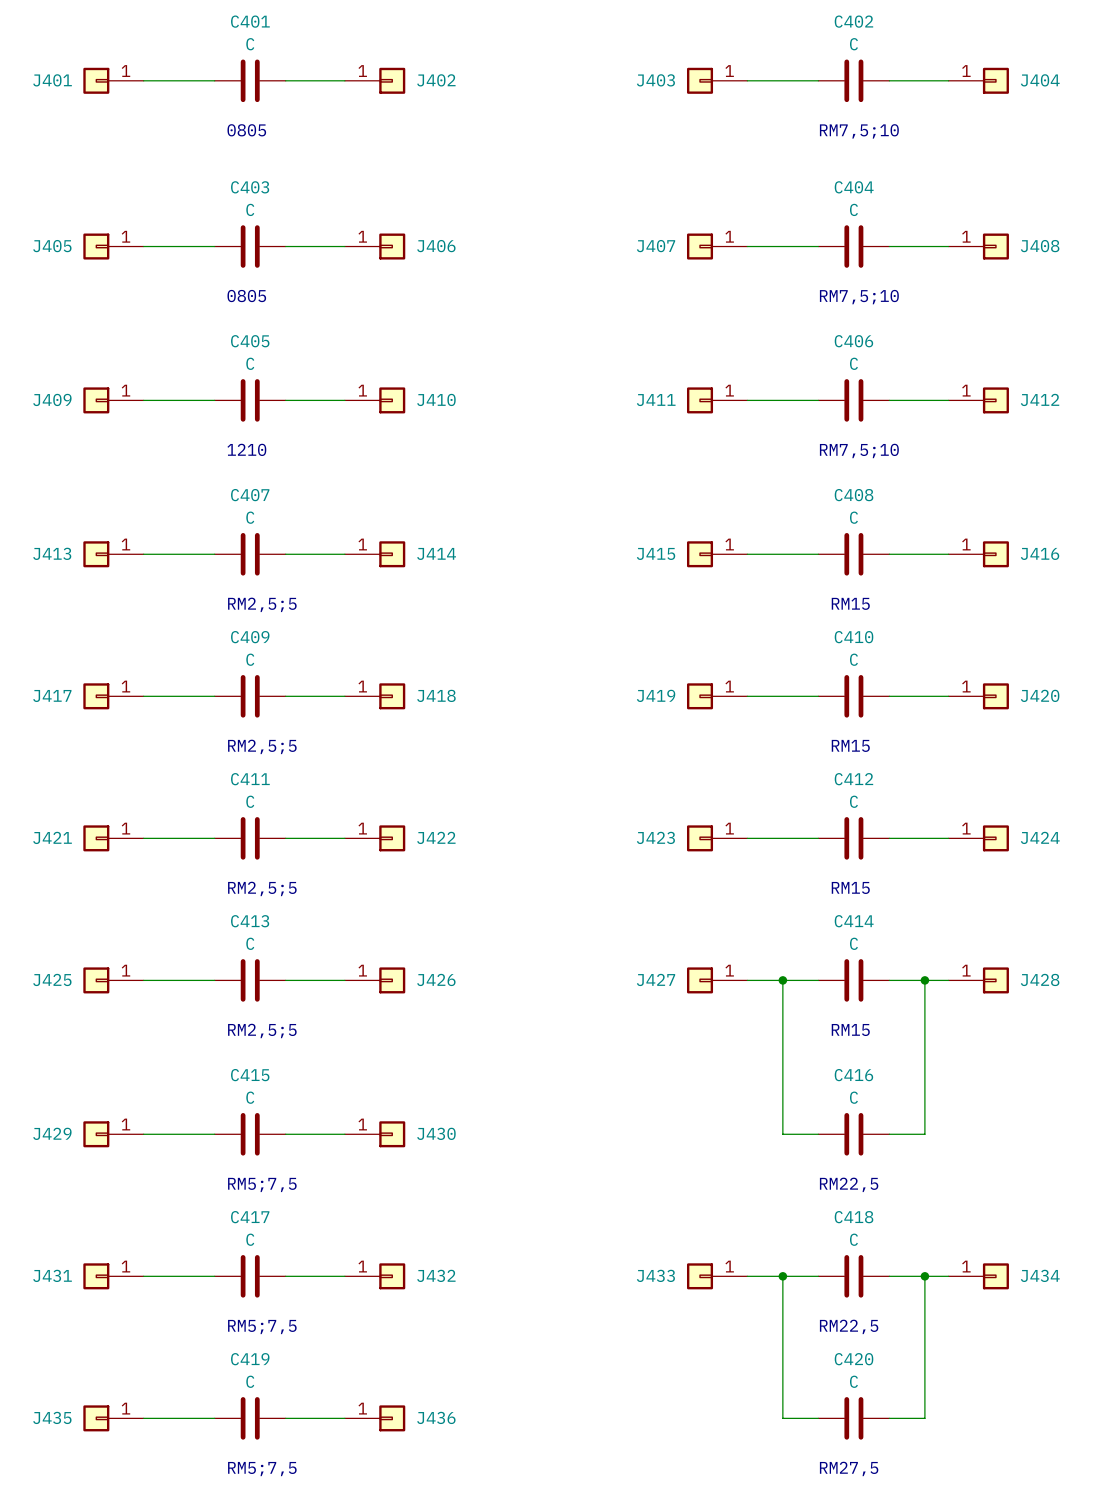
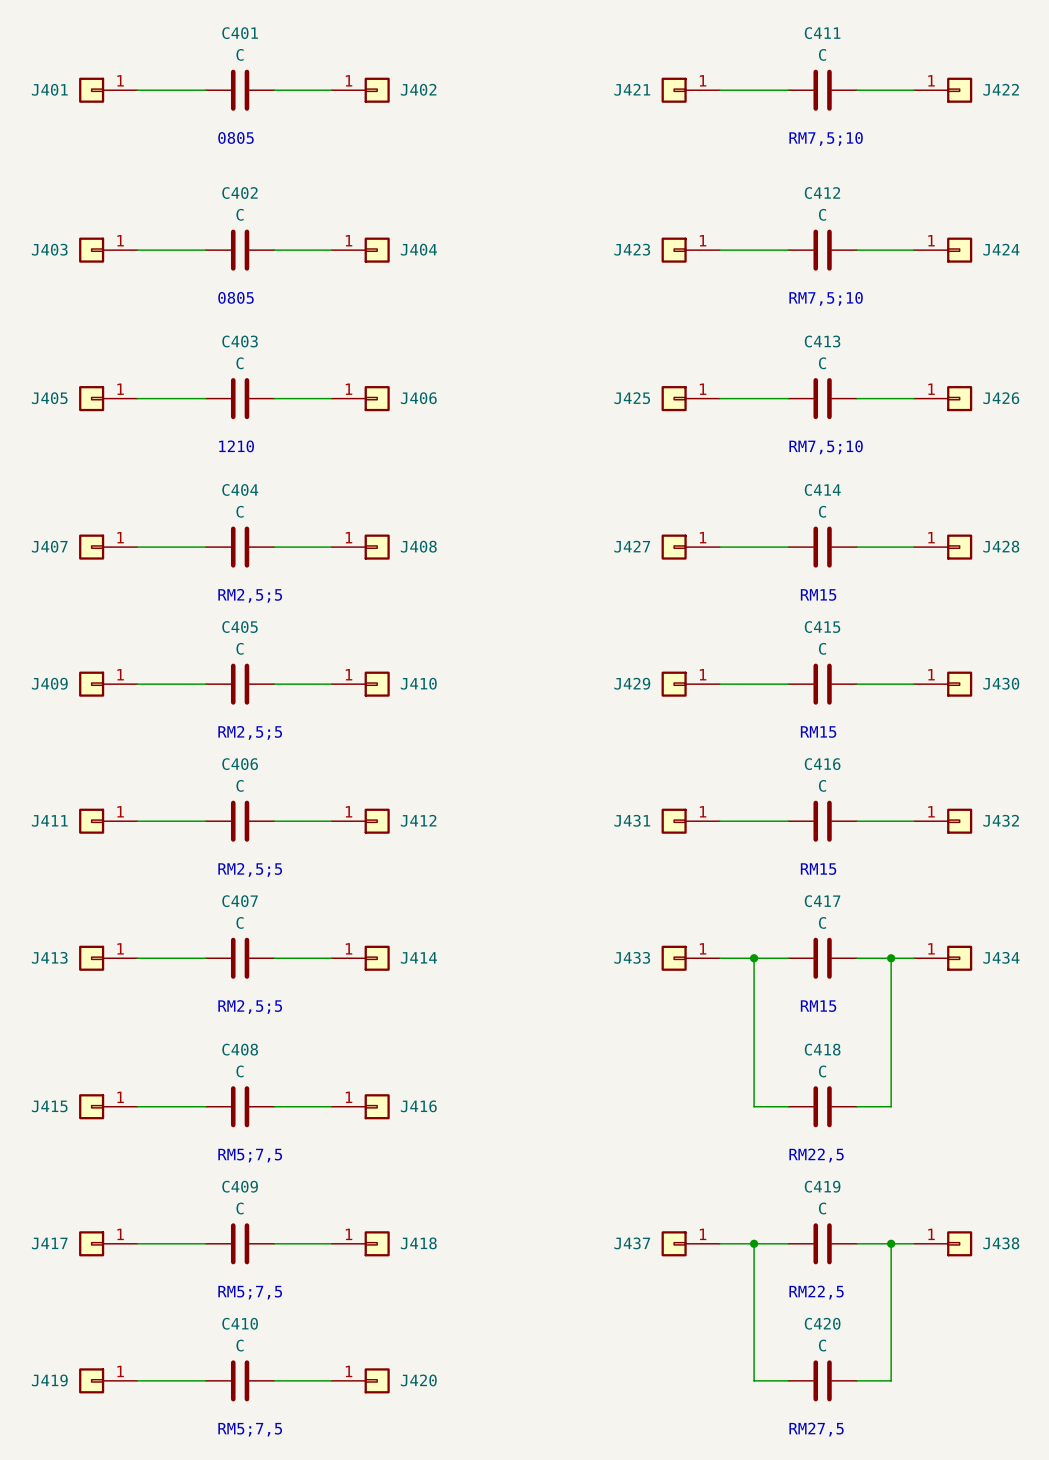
C402 name: C402 (853, 21) -> C411 (822, 33)
J403 name: J403 (655, 80) -> J421 (632, 89)
J404 name: J404 (1040, 80) -> J422 (1001, 89)
C403 name: C403 (250, 187) -> C402 (239, 193)
C404 name: C404 (854, 187) -> C412 (822, 193)
J405 name: J405 (52, 246) -> J403 (49, 249)
J406 name: J406 (436, 246) -> J404 (418, 249)
J407 name: J407 (656, 246) -> J423 (632, 249)
J408 name: J408 (1040, 246) -> J424 (1001, 249)
C405 name: C405 (250, 341) -> C403 (240, 341)
C406 name: C406 (853, 341) -> C413 (822, 341)
J409 name: J409 (52, 399) -> J405 (49, 398)
J410 name: J410 (436, 399) -> J406 (418, 398)
J412 name: J412 (1040, 399) -> J426 (1001, 398)
J411 name: J411 (656, 400) -> J425 (632, 398)
C407 name: C407 (250, 495) -> C404 (240, 489)
C408 name: C408 (854, 495) -> C414 (822, 489)
J413 name: J413 (52, 553) -> J407 (49, 546)
J414 name: J414 (436, 553) -> J408 (418, 546)
J415 name: J415 (656, 553) -> J427 (632, 546)
J416 name: J416 (1040, 553) -> J428 (1001, 546)
C409 name: C409 (250, 637) -> C405 (240, 627)
C410 name: C410 (854, 637) -> C415 (822, 627)
J417 name: J417 (52, 695) -> J409 (49, 683)
J418 name: J418 (436, 695) -> J410 (418, 683)
J419 name: J419 (656, 695) -> J429 (632, 683)
J420 name: J420 (1040, 695) -> J430 (1001, 683)
C411 name: C411 (250, 779) -> C406 (240, 764)
C412 name: C412 (853, 779) -> C416 (822, 764)
J421 name: J421 (52, 837) -> J411 (49, 820)
J422 name: J422 (436, 837) -> J412 (418, 820)
J423 name: J423 (655, 837) -> J431 (632, 820)
J424 name: J424 (1040, 837) -> J432 (1001, 820)
C413 name: C413 (250, 921) -> C407 (240, 901)
C414 name: C414 (854, 921) -> C417 (822, 901)
J425 name: J425 (52, 979) -> J413 (49, 957)
J426 name: J426 (436, 979) -> J414 (418, 957)
J427 name: J427 (656, 979) -> J433 (632, 957)
J428 name: J428 (1040, 979) -> J434 (1001, 957)
C415 name: C415 (250, 1075) -> C408 (240, 1049)
C416 name: C416 (853, 1075) -> C418 (822, 1049)
J429 name: J429 (52, 1133) -> J415 (49, 1106)
J430 name: J430 (436, 1133) -> J416 (418, 1106)
C417 name: C417 (250, 1217) -> C409 (240, 1186)
C418 name: C418 (854, 1217) -> C419 (822, 1186)
J431 name: J431 (52, 1275) -> J417 (49, 1243)
J432 name: J432 (436, 1275) -> J418 (418, 1243)
J433 name: J433 (655, 1275) -> J437 (632, 1243)
J434 name: J434 (1040, 1275) -> J438 (1001, 1243)
C419 name: C419 (250, 1359) -> C410 (240, 1323)
J435 name: J435 (52, 1417) -> J419 (49, 1380)
J436 name: J436 (436, 1417) -> J420 (418, 1380)

